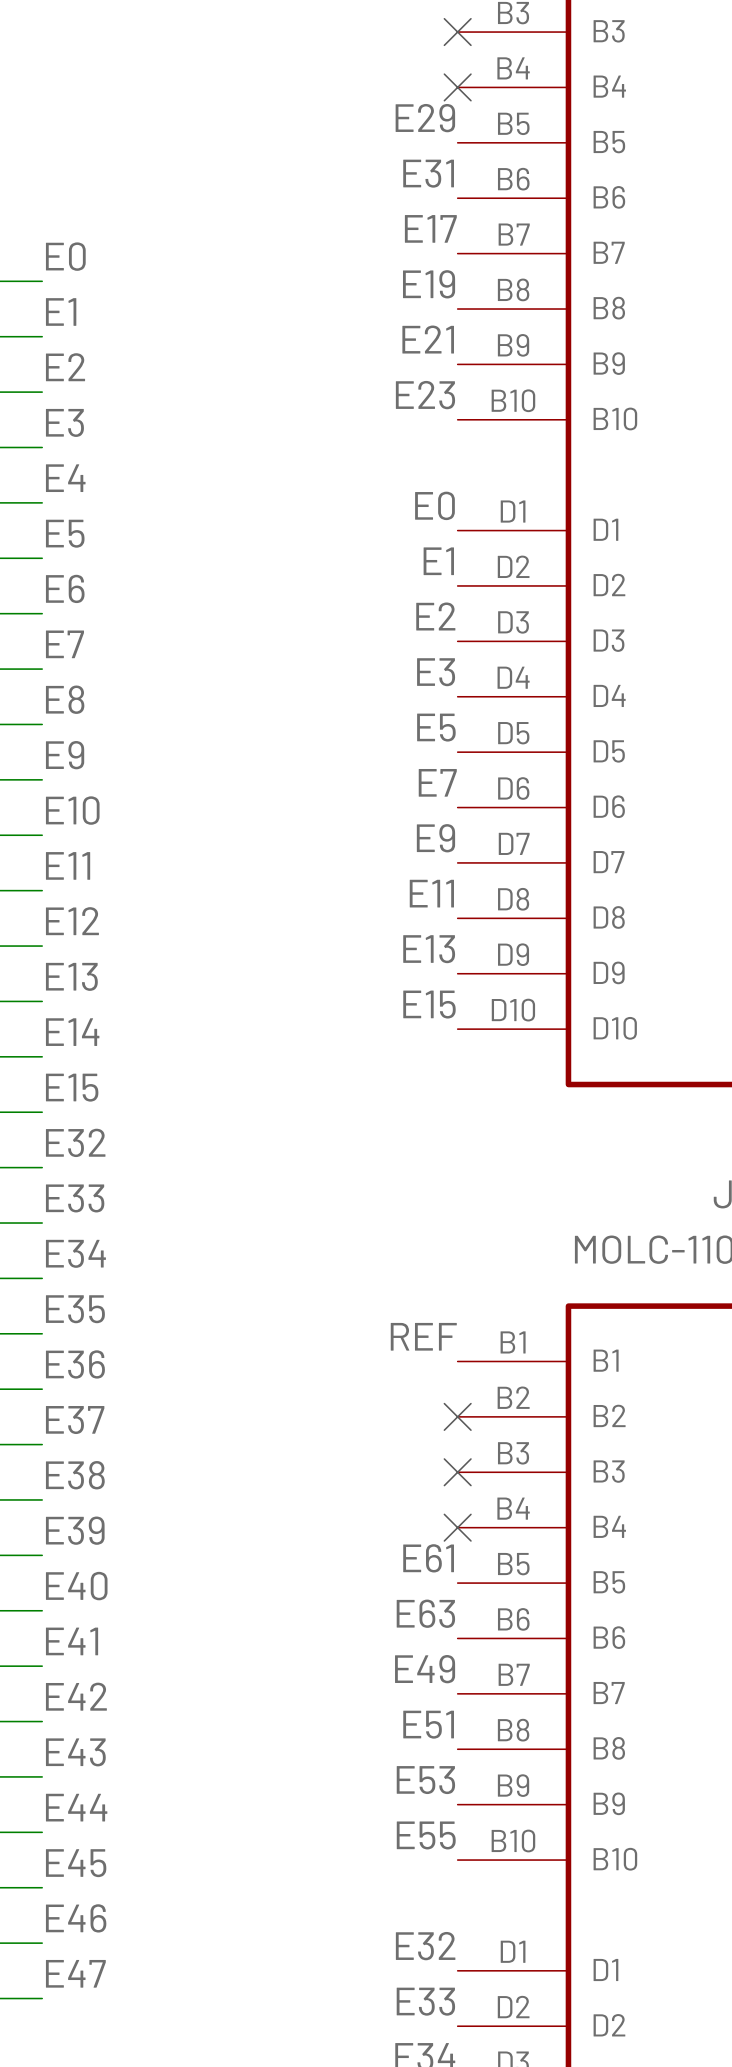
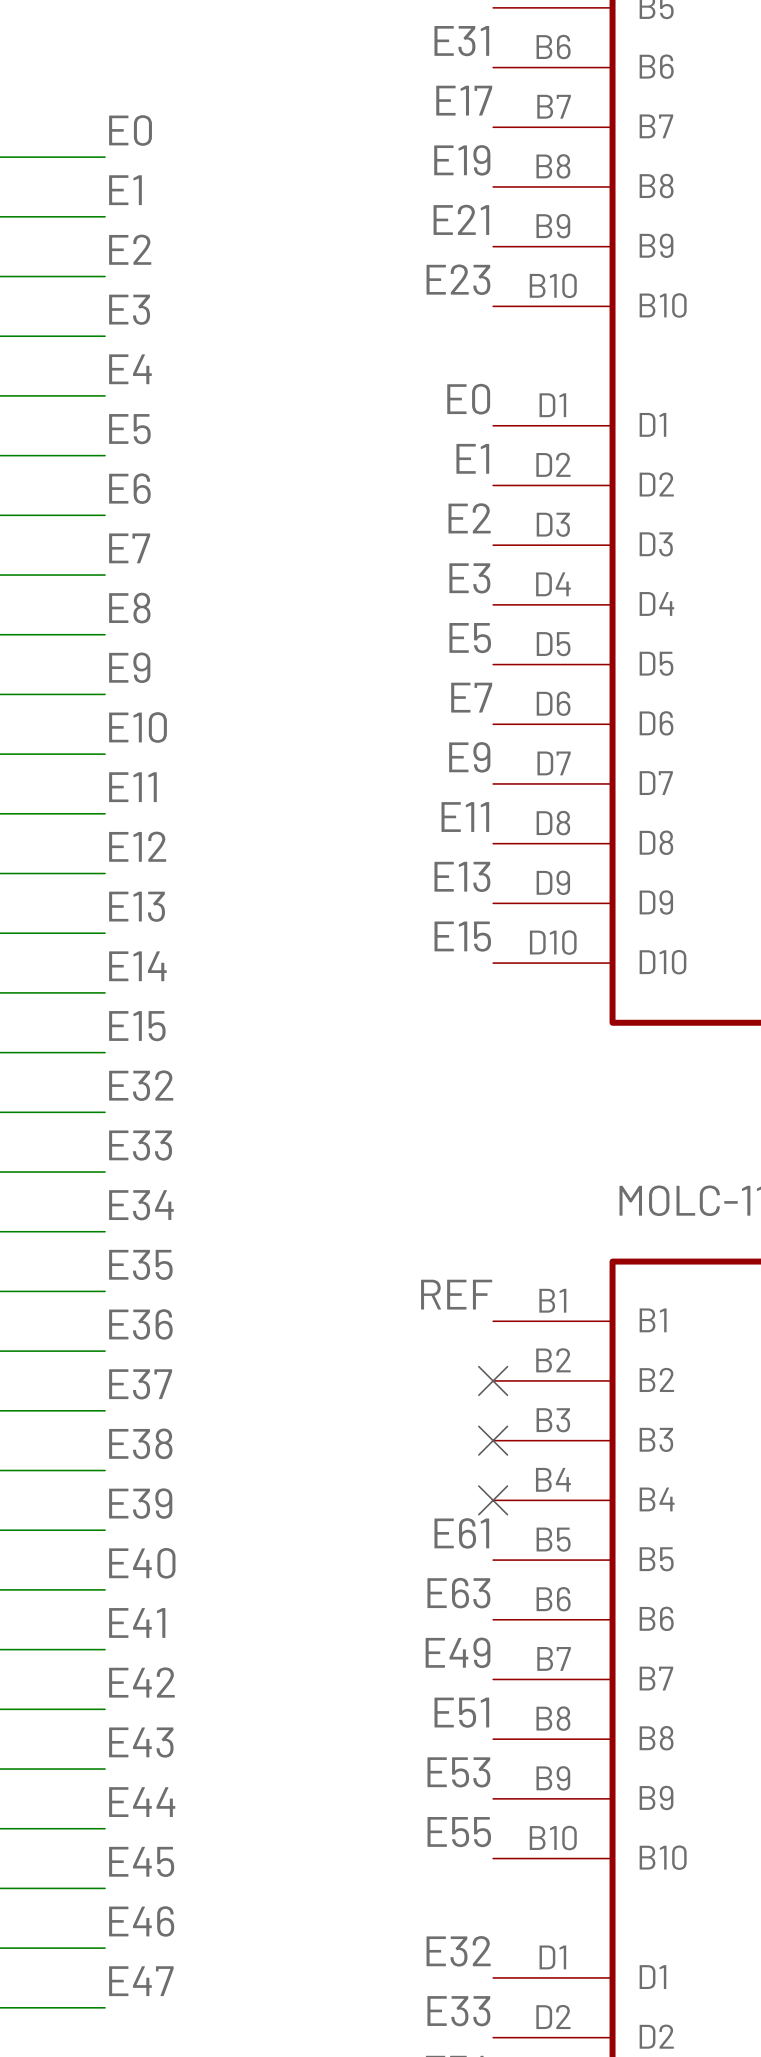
label position: E0 (65, 256) -> E0 (130, 130)
wire: none -> (45, 157) (105, 157)
label position: E1 (61, 311) -> E1 (125, 190)
wire: none -> (45, 216) (105, 216)
label position: E2 (65, 367) -> E2 (130, 249)
wire: none -> (45, 276) (105, 276)
label position: E3 (64, 422) -> E3 (129, 309)
wire: none -> (45, 336) (105, 336)
label position: E4 (65, 478) -> E4 (130, 369)
wire: none -> (45, 395) (105, 395)
label position: E5 (65, 533) -> E5 (129, 429)
wire: none -> (45, 455) (105, 455)
label position: E6 (65, 588) -> E6 (129, 488)
wire: none -> (45, 515) (105, 515)
label position: E7 (64, 644) -> E7 (129, 548)
wire: none -> (45, 575) (105, 575)
label position: E8 (65, 699) -> E8 (129, 608)
wire: none -> (45, 634) (105, 634)
label position: E9 (65, 755) -> E9 (129, 667)
wire: none -> (45, 694) (105, 694)
label position: E10 (72, 810) -> E10 (138, 727)
wire: none -> (45, 754) (105, 754)
label position: E11 (68, 865) -> E11 (132, 787)
wire: none -> (45, 813) (105, 813)
label position: E12 (72, 921) -> E12 (137, 846)
wire: none -> (45, 873) (105, 873)
label position: E13 (71, 976) -> E13 (137, 906)
wire: none -> (45, 933) (105, 933)
label position: E14 (72, 1032) -> E14 (137, 966)
wire: none -> (45, 992) (105, 992)
label position: E15 (72, 1087) -> E15 (137, 1026)
wire: none -> (45, 1052) (105, 1052)
label position: E32 (75, 1142) -> E32 (141, 1085)
wire: none -> (45, 1112) (105, 1112)
label position: E33 (75, 1198) -> E33 (140, 1145)
wire: none -> (45, 1172) (105, 1172)
label position: E34 (75, 1253) -> E34 (141, 1205)
wire: none -> (45, 1231) (105, 1231)
label position: E35 (75, 1309) -> E35 (140, 1264)
wire: none -> (45, 1291) (105, 1291)
label position: E36 (75, 1364) -> E36 (140, 1324)
wire: none -> (45, 1351) (105, 1351)
label position: E37 (75, 1420) -> E37 (140, 1384)
wire: none -> (45, 1410) (105, 1410)
label position: E38 (75, 1475) -> E38 (140, 1443)
wire: none -> (45, 1470) (105, 1470)
label position: E39 (75, 1530) -> E39 (140, 1503)
wire: none -> (45, 1530) (105, 1530)
label position: E40 (76, 1586) -> E40 (142, 1563)
wire: none -> (45, 1589) (105, 1589)
label position: E41 (72, 1641) -> E41 (137, 1622)
wire: none -> (45, 1649) (105, 1649)
label position: E42 (76, 1696) -> E42 (141, 1682)
wire: none -> (45, 1709) (105, 1709)
label position: E43 (75, 1752) -> E43 (141, 1742)
wire: none -> (45, 1769) (105, 1769)
label position: E44 (76, 1807) -> E44 (142, 1802)
wire: none -> (45, 1828) (105, 1828)
label position: E45 (76, 1863) -> E45 (141, 1861)
wire: none -> (45, 1888) (105, 1888)
label position: E46 (76, 1918) -> E46 (141, 1921)
wire: none -> (45, 1948) (105, 1948)
label position: E47 (75, 1973) -> E47 (141, 1981)
wire: none -> (45, 2007) (105, 2007)

